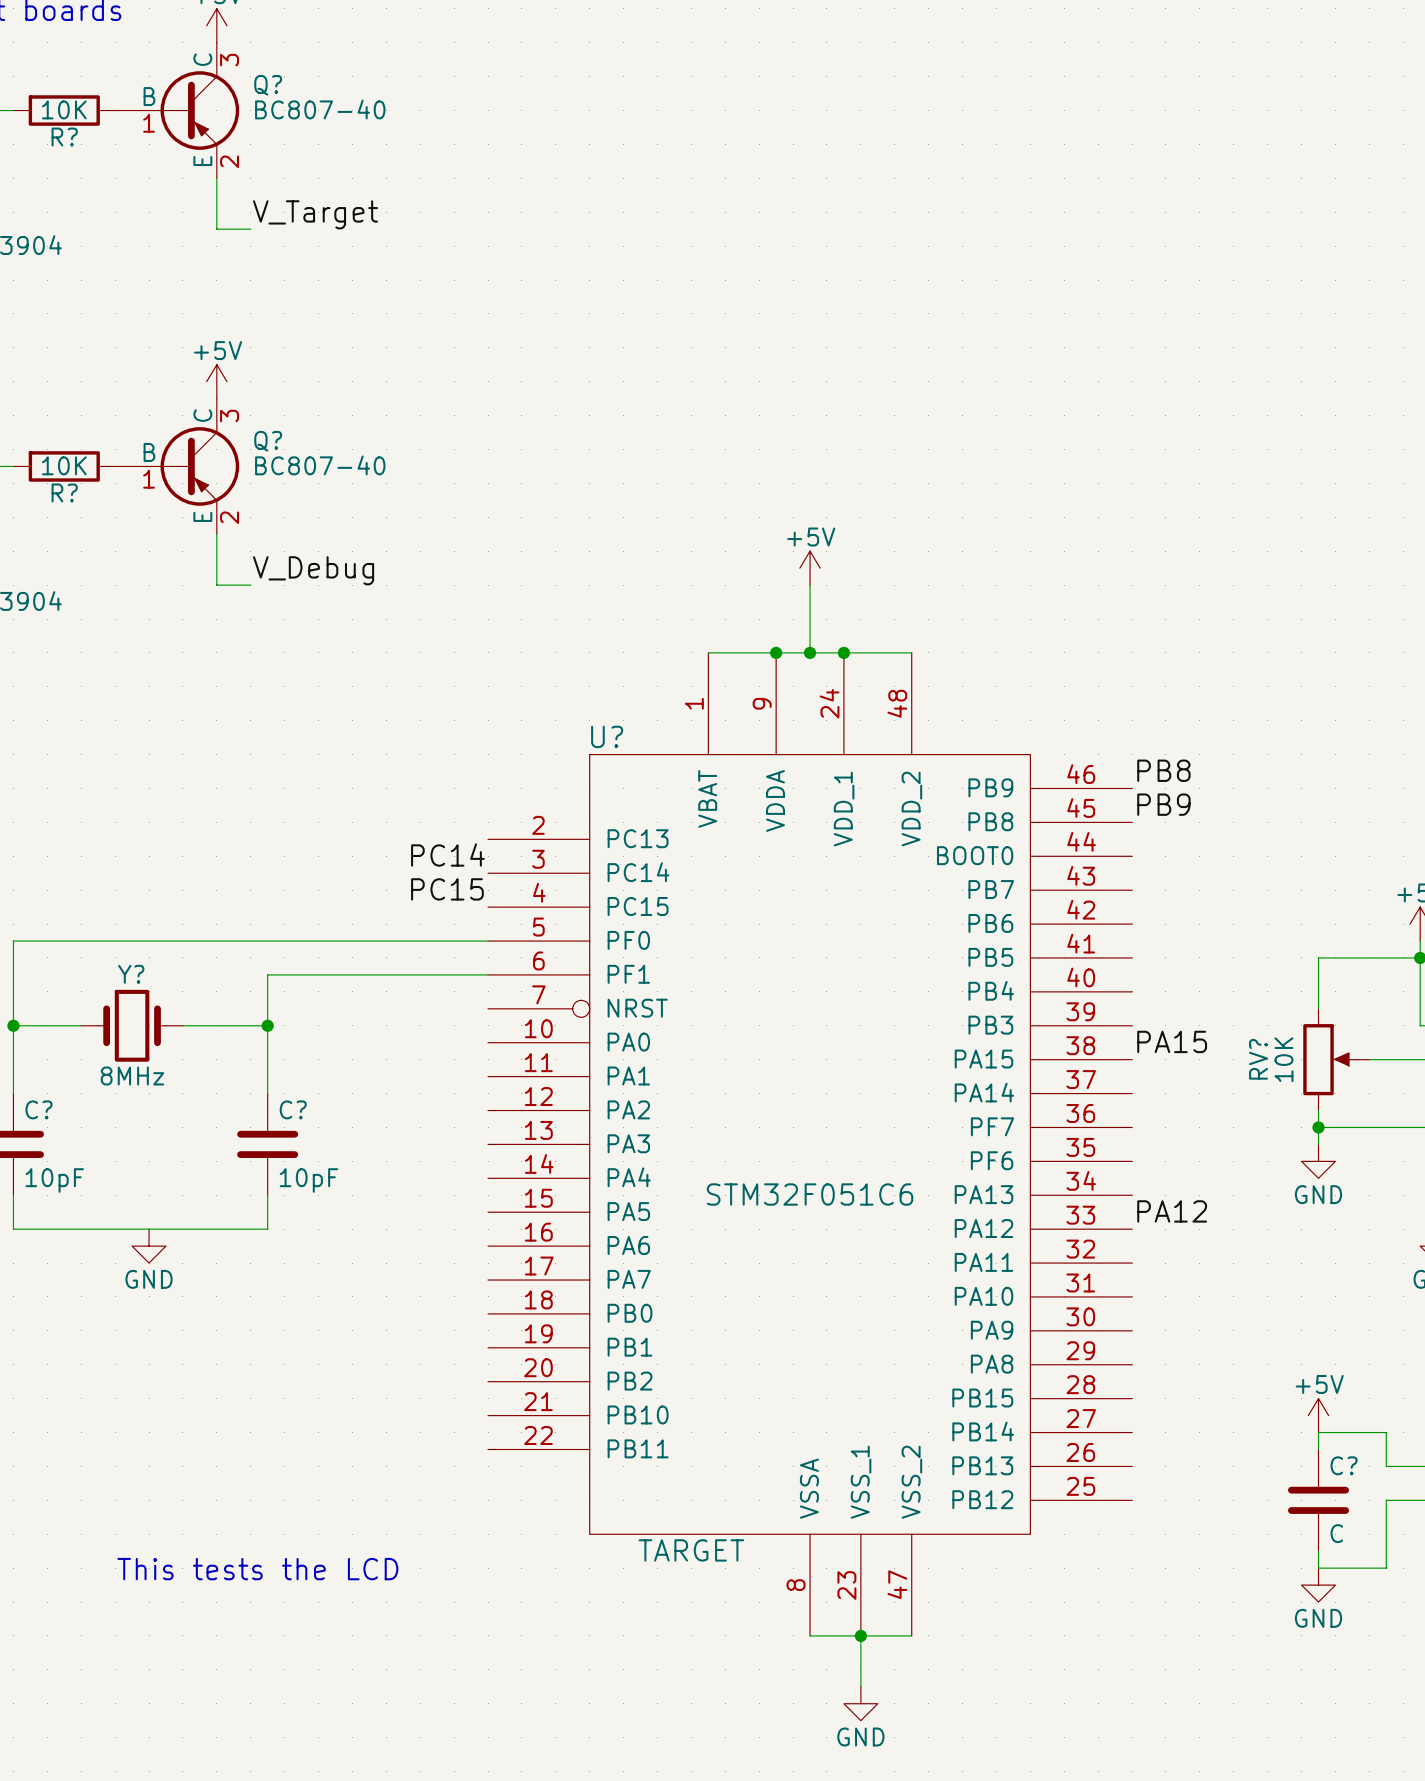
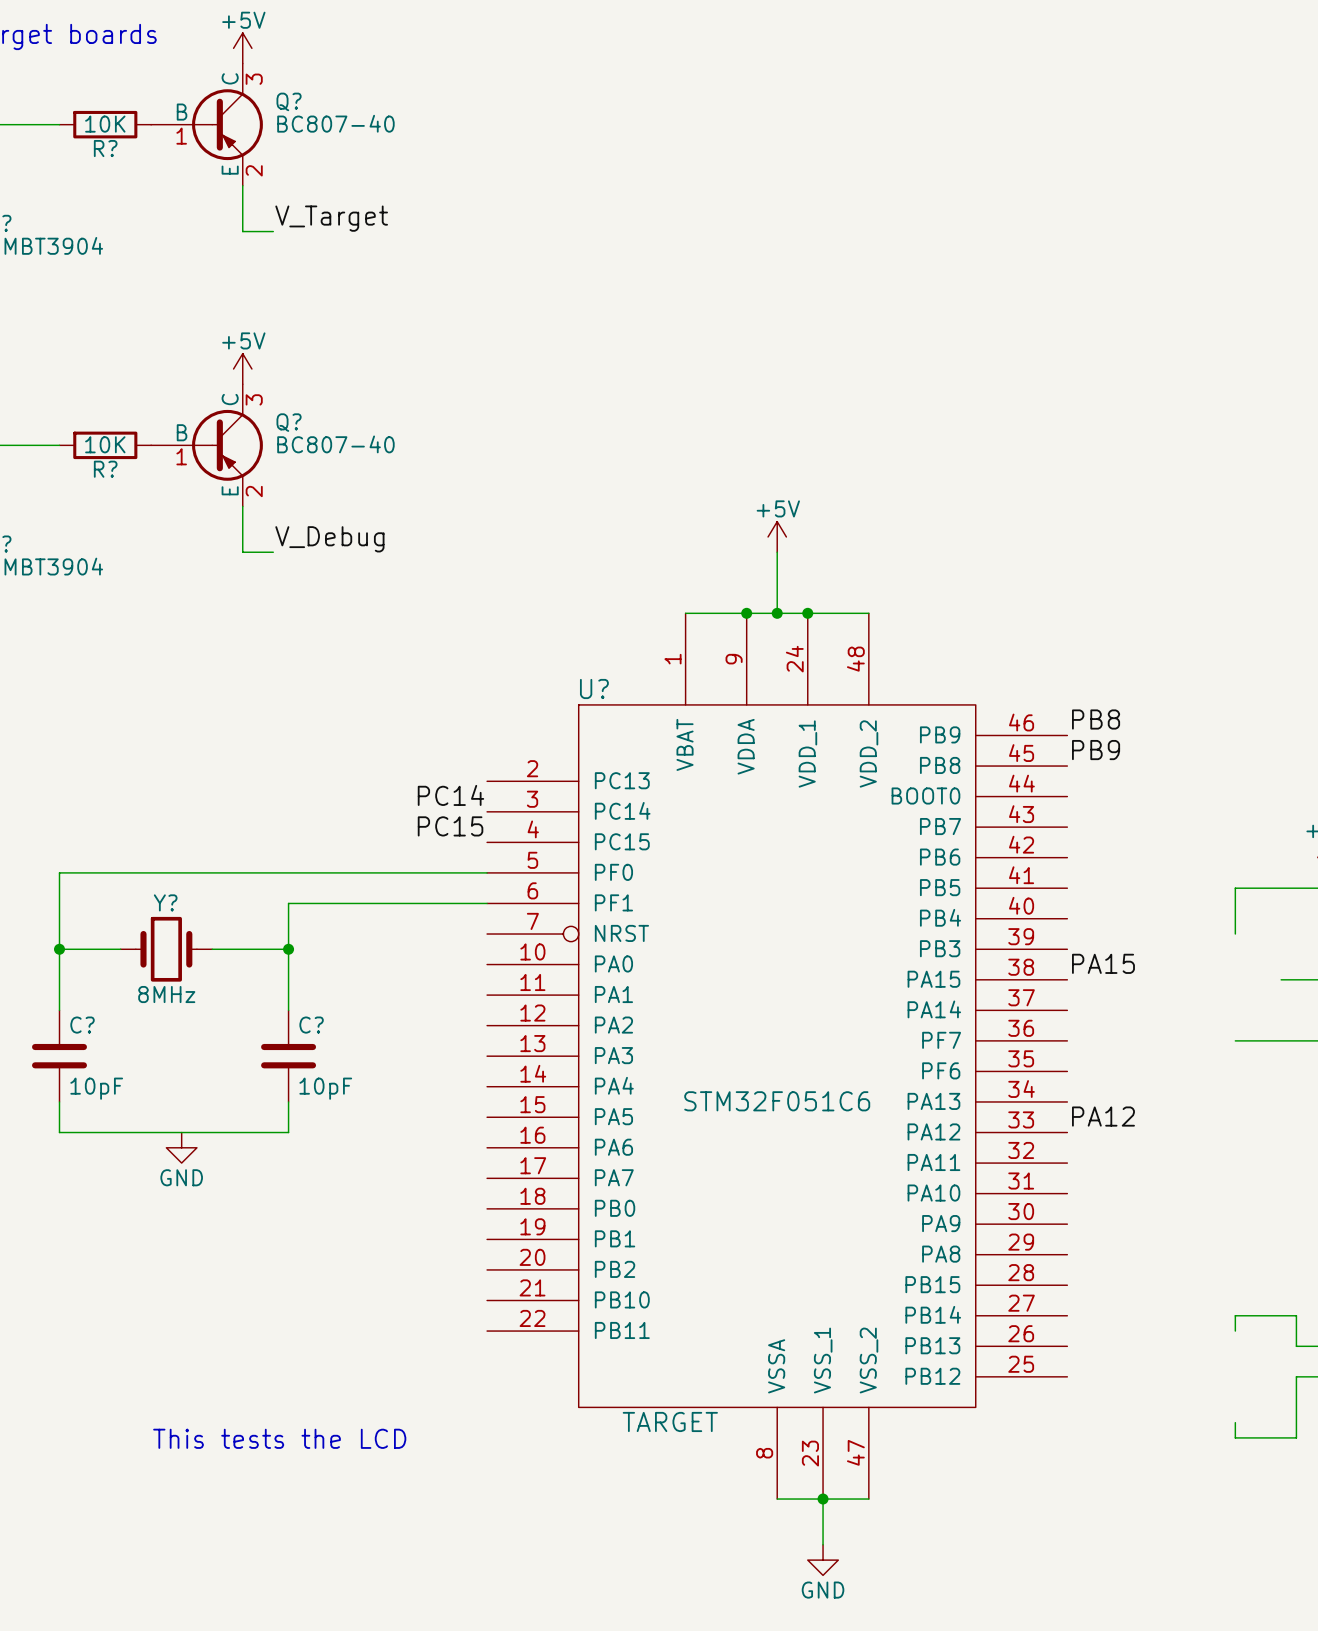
RV?: 10K (1336, 1059) -> none
wire: (1318, 1110) (1318, 1144) -> none
junction: (1318, 1127) -> none
power symbol: GND (1318, 1161) -> none
power symbol: +5V (1318, 1415) -> none
C?: C (1318, 1500) -> none
power symbol: GND (1318, 1585) -> none

